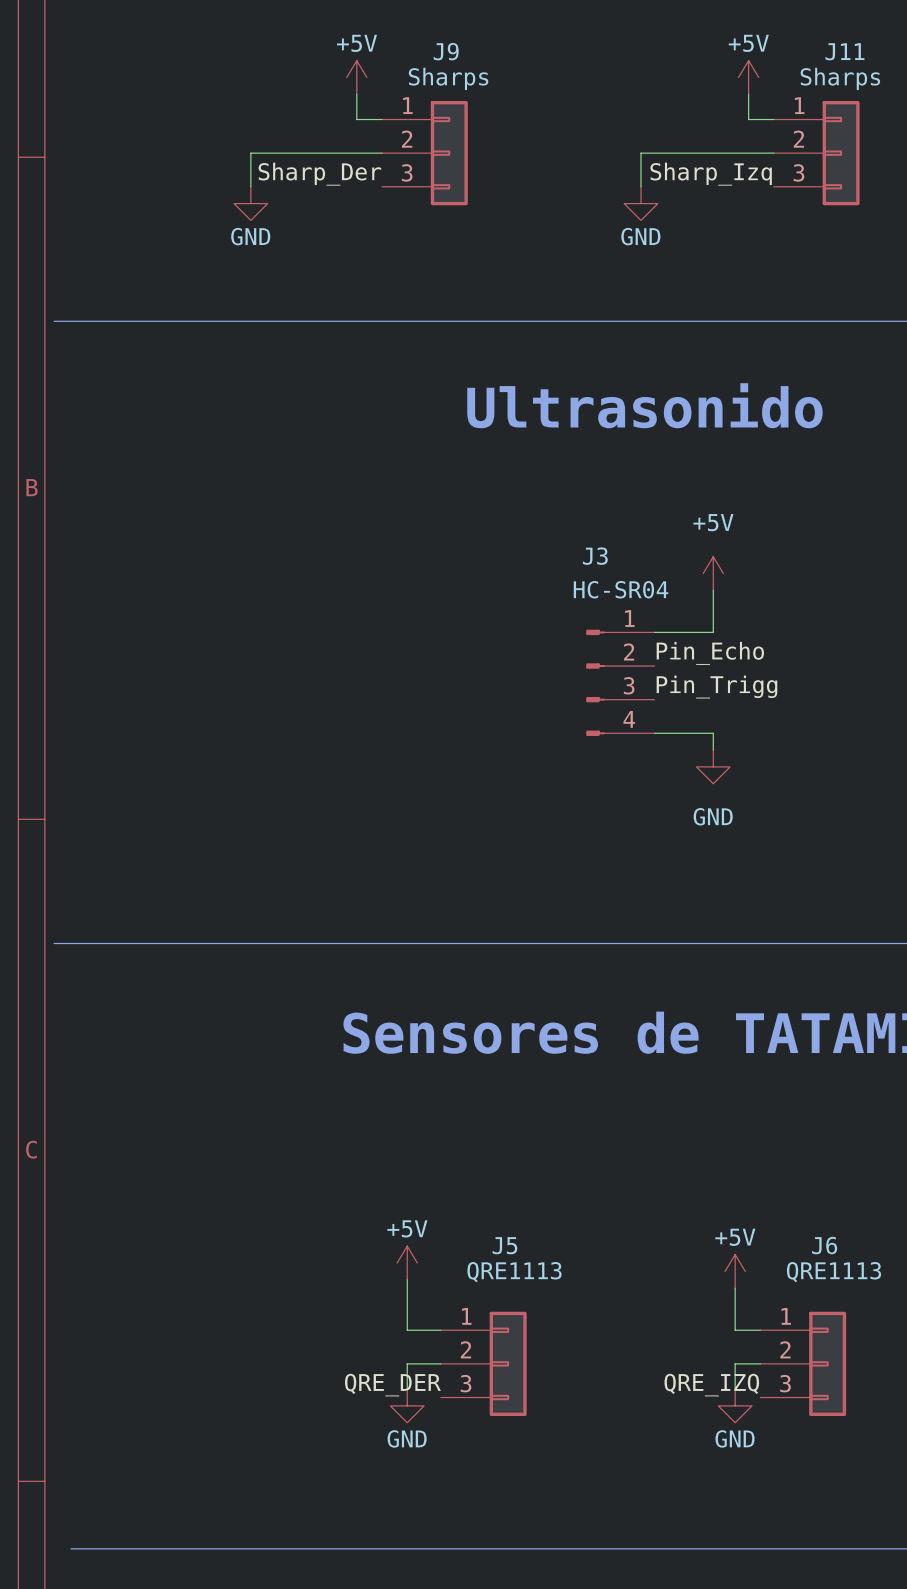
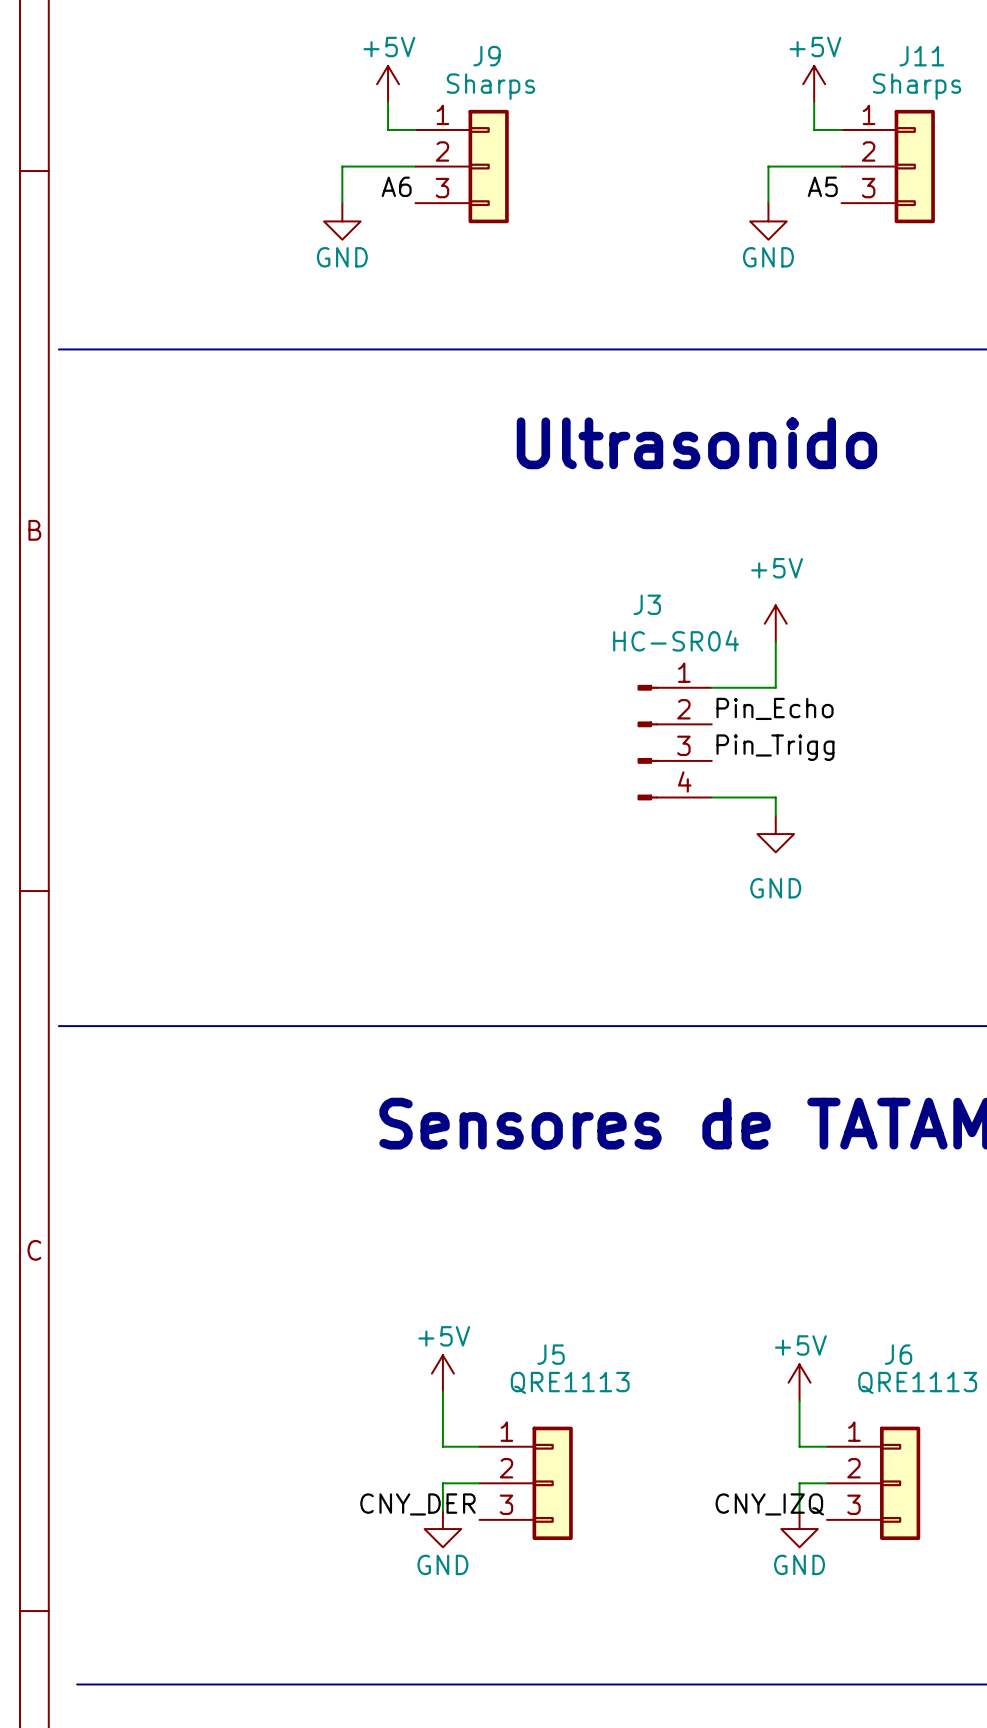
wire: (314, 153) (250, 153) (250, 186) -> (342, 166) (342, 203)
wire: (706, 153) (641, 153) (641, 186) -> (768, 166) (768, 203)
label: Sharp_Der (319, 174) -> A6 (396, 186)
label: Sharp_Izq (711, 174) -> A5 (822, 186)
power symbol position: GND (250, 203) -> GND (342, 221)
power symbol position: GND (641, 203) -> GND (768, 221)
label: QRE_DER (392, 1385) -> CNY_DER (417, 1504)
label: QRE_IZQ (711, 1385) -> CNY_IZQ (769, 1504)

